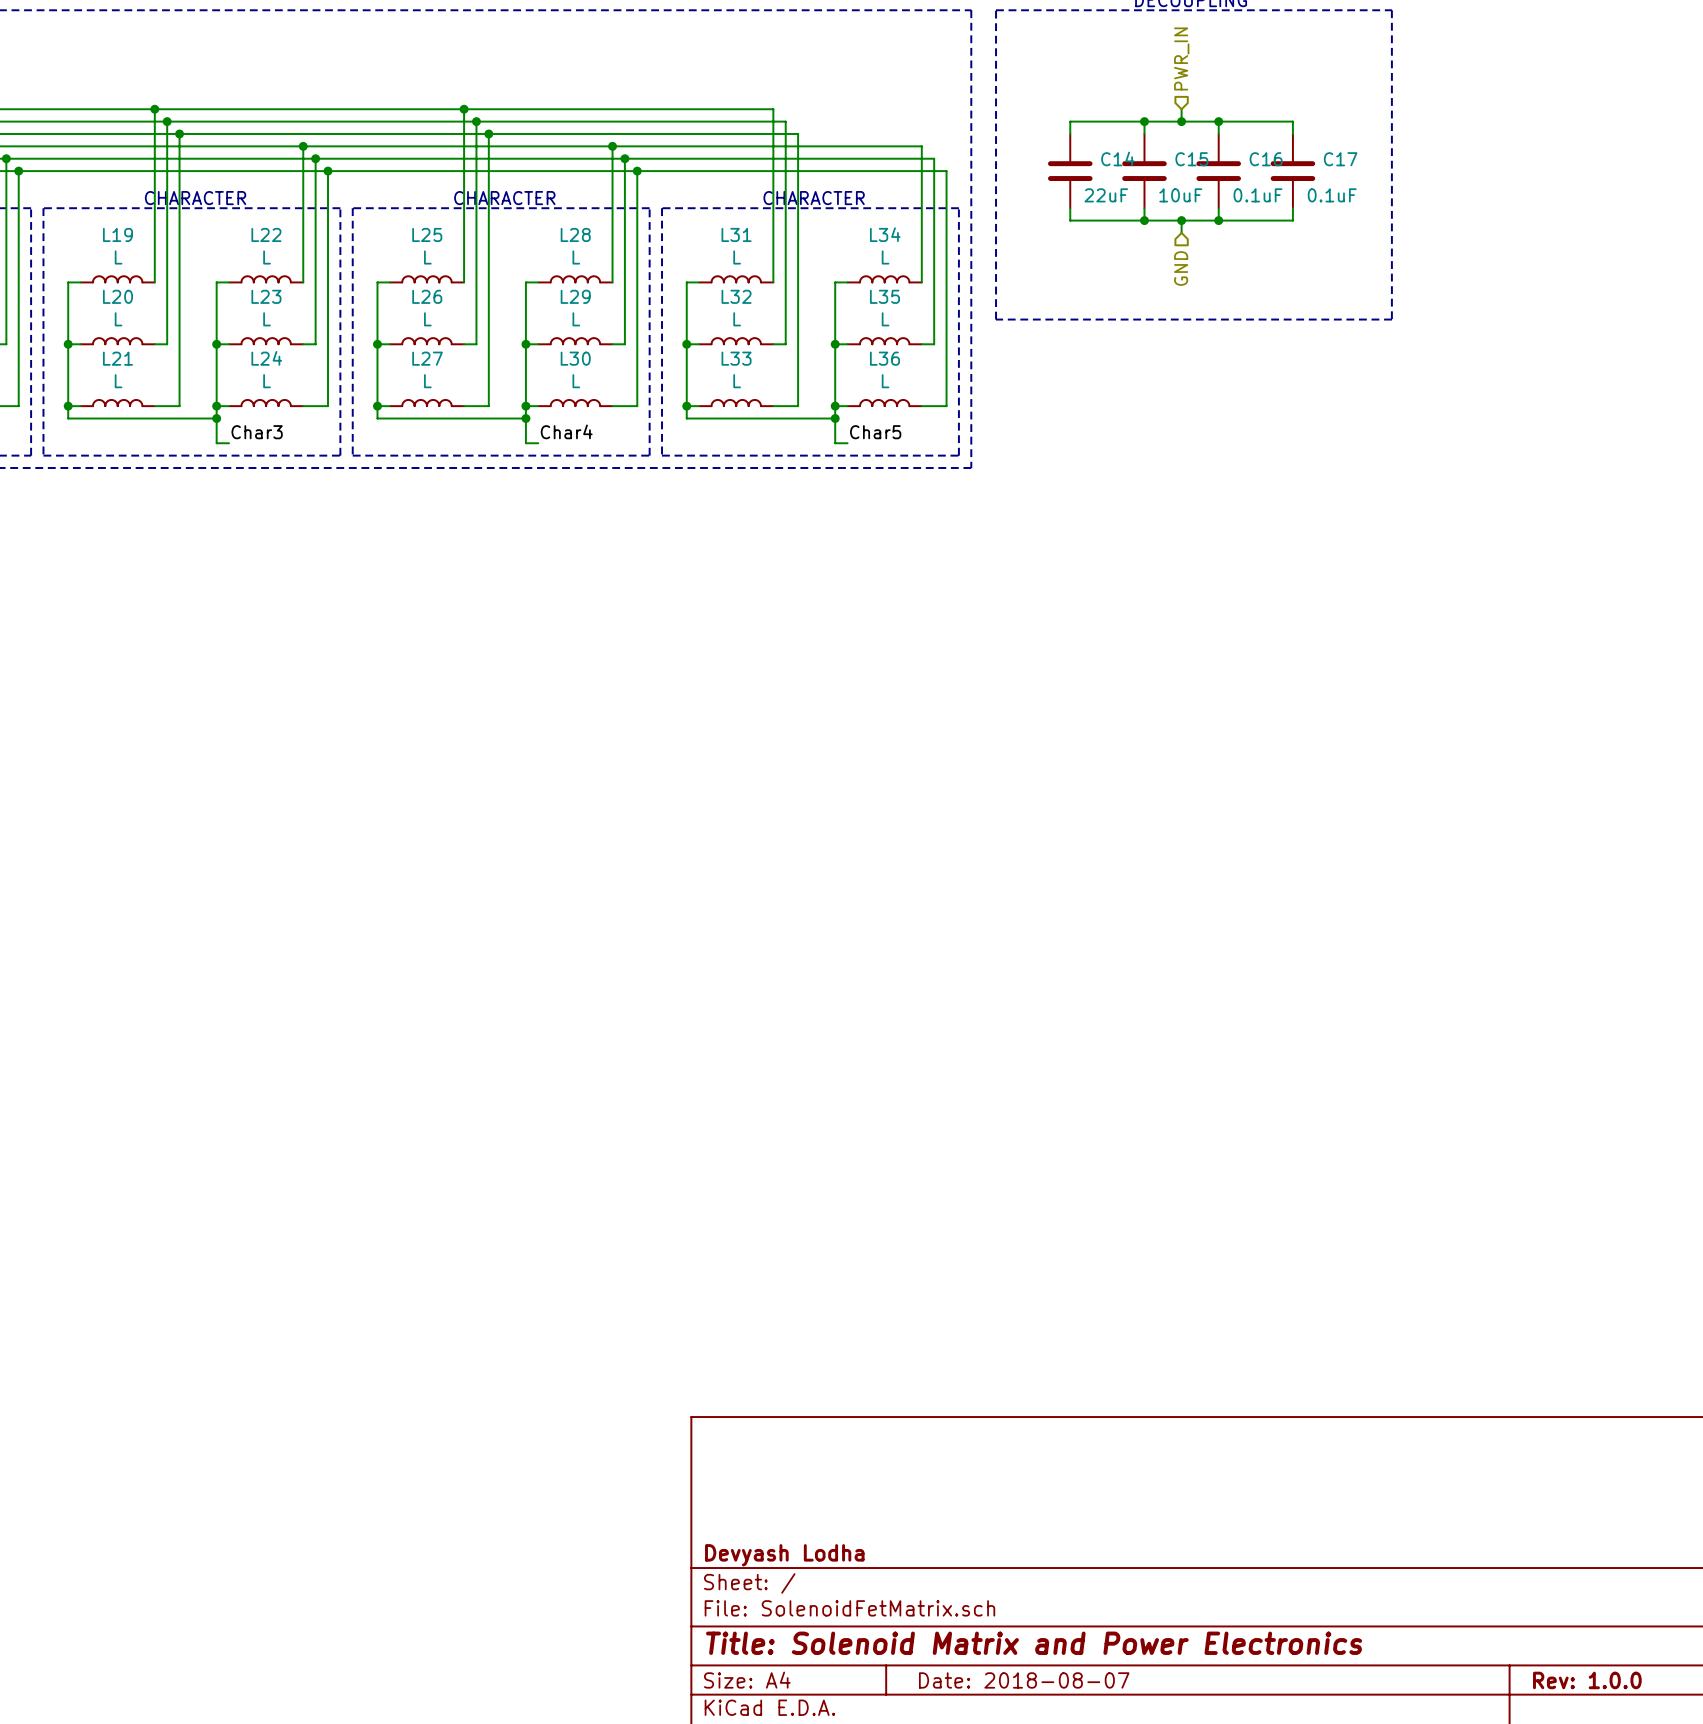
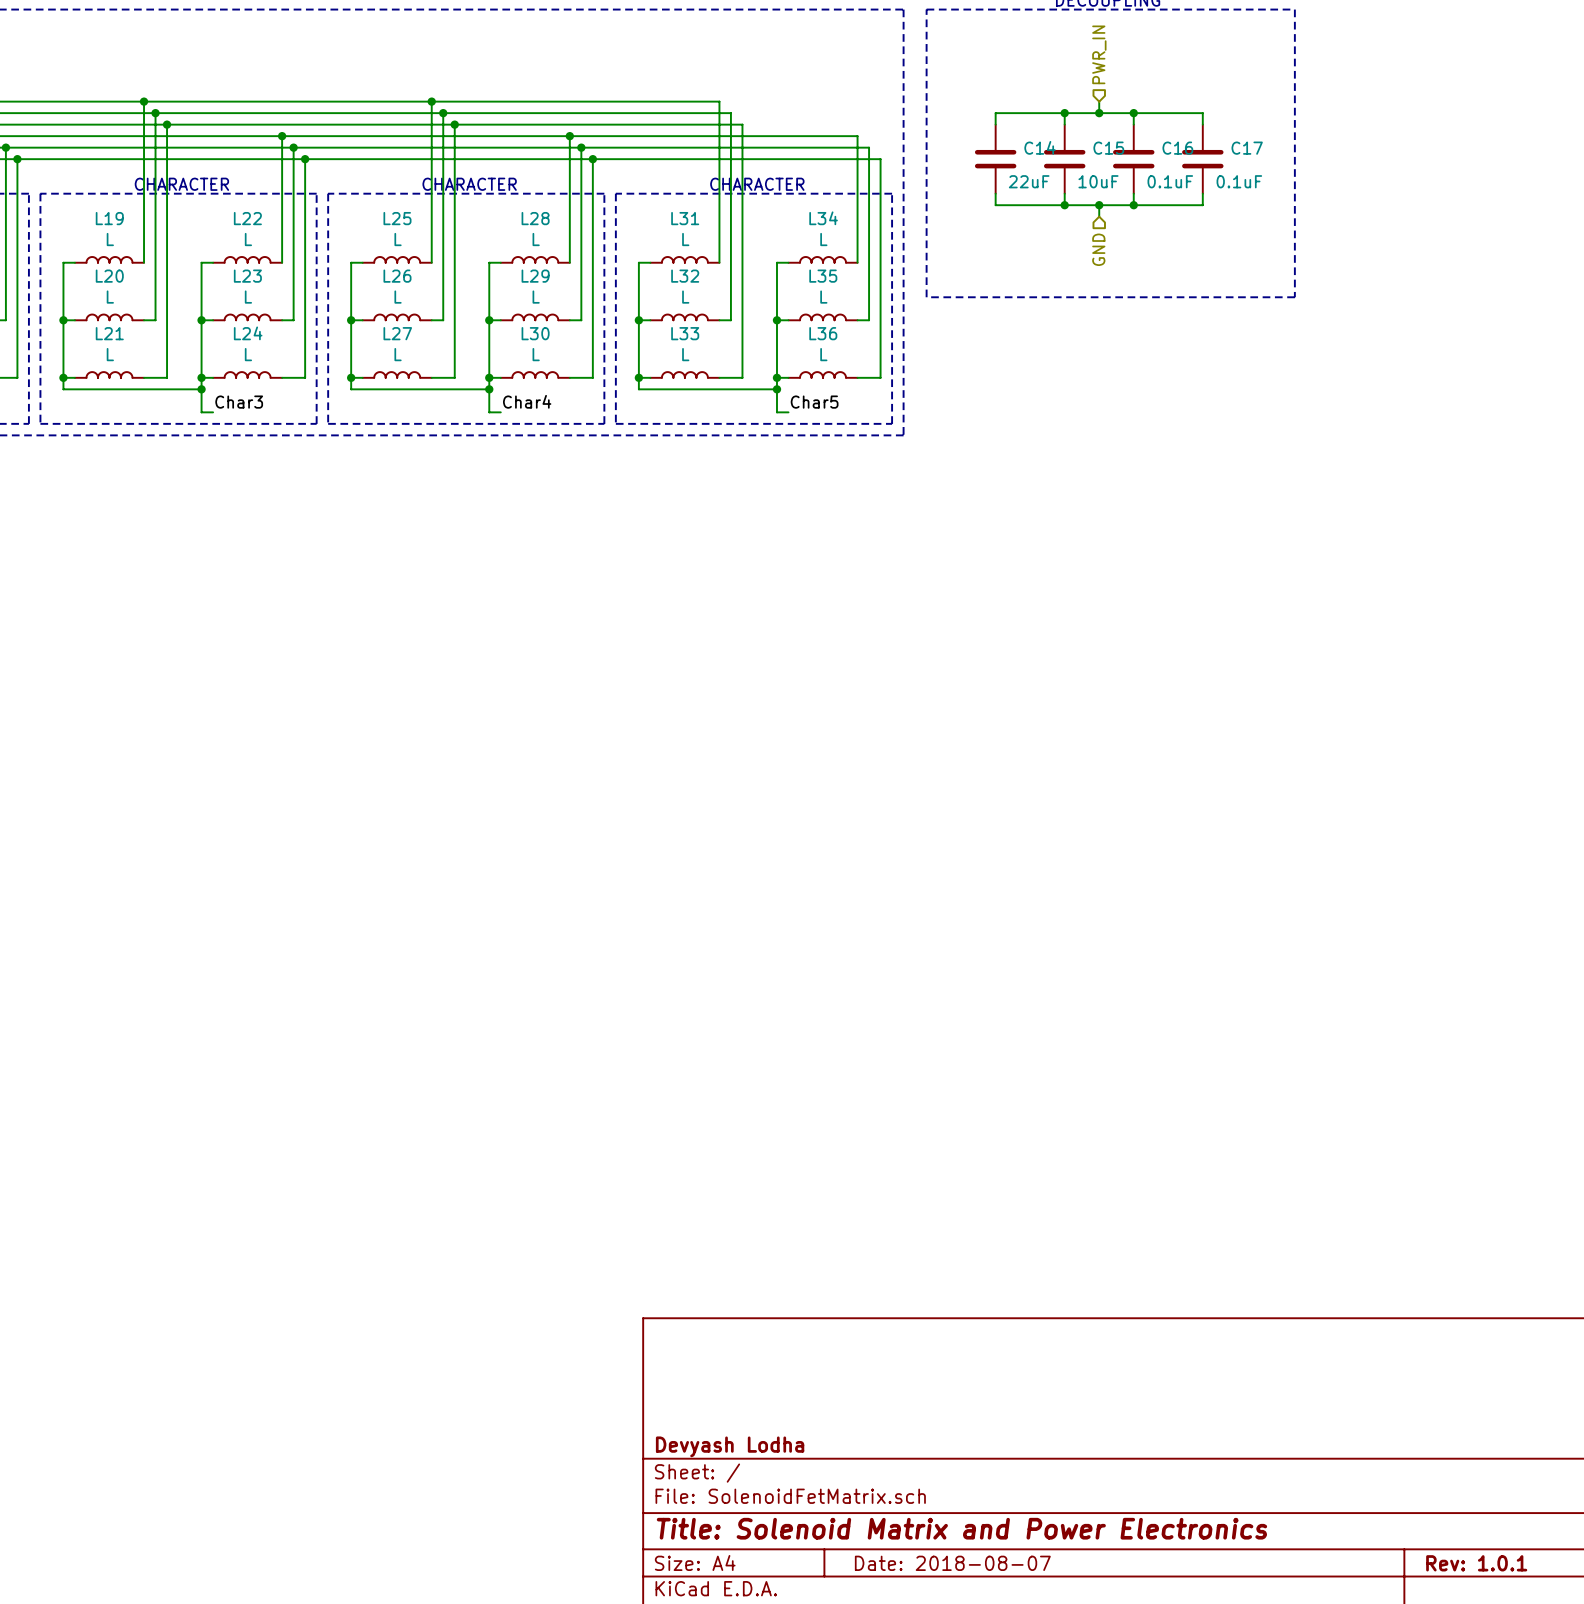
title block: Rev: 1.0.0 (1587, 1680) -> Rev: 1.0.1 (1476, 1563)

